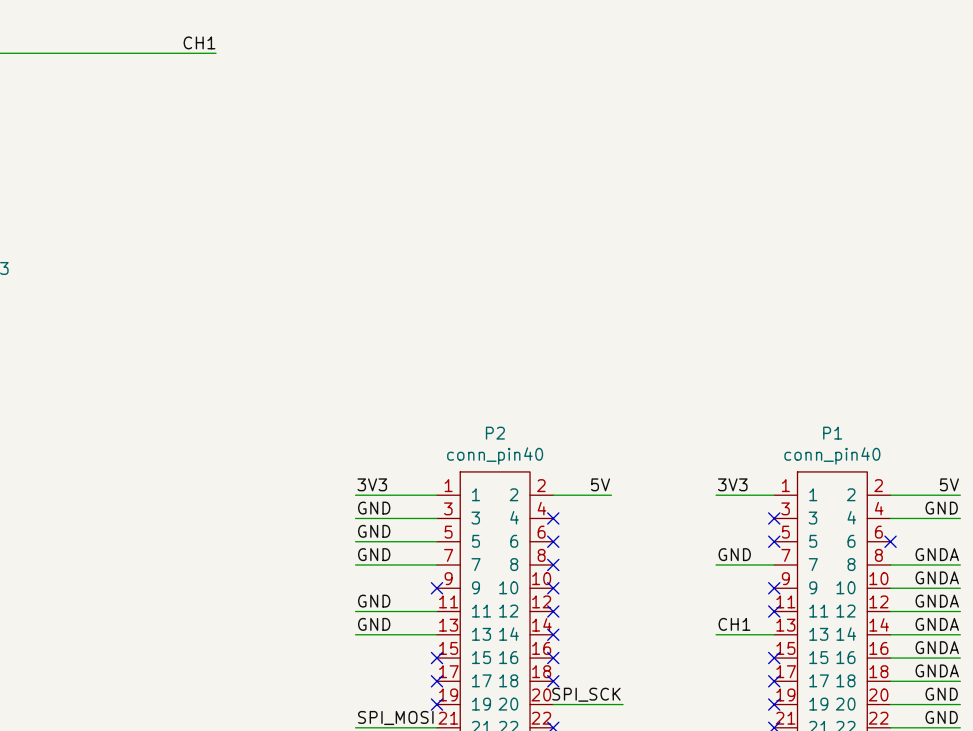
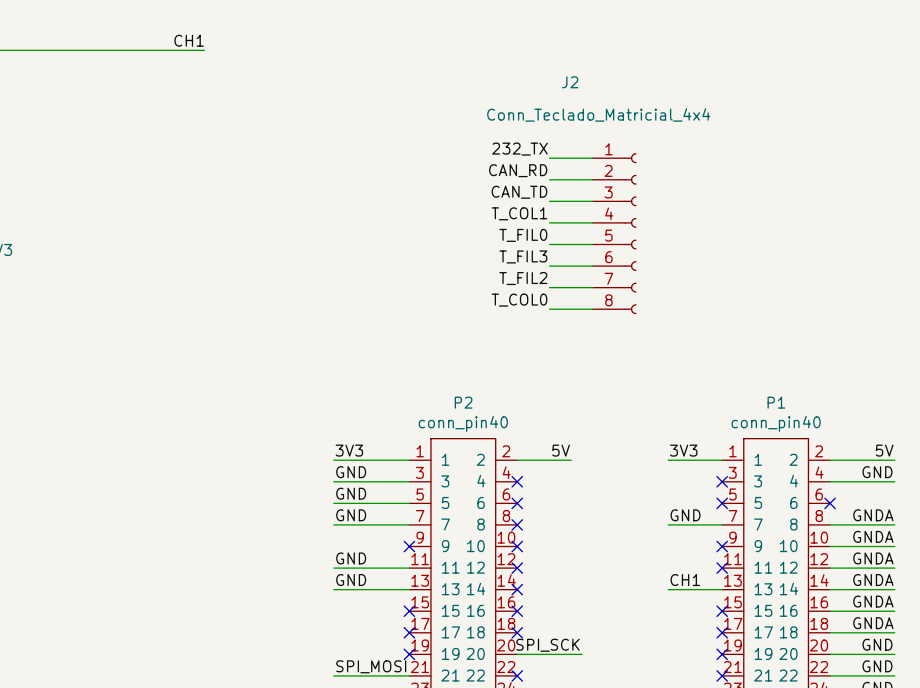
label: none -> 232_TX (519, 149)
wire: none -> (549, 158) (592, 158)
label: none -> CAN_RD (518, 170)
wire: none -> (549, 179) (592, 179)
label: none -> CAN_TD (519, 192)
wire: none -> (549, 201) (592, 201)
label: none -> T_COL1 (519, 213)
wire: none -> (549, 222) (592, 222)
J2: none -> Conn_Teclado_Matricial_4x4 (614, 233)
label: none -> T_FIL0 (523, 235)
wire: none -> (549, 244) (592, 244)
label: none -> T_FIL3 (523, 256)
wire: none -> (549, 266) (592, 266)
label: none -> T_FIL2 (523, 278)
wire: none -> (549, 287) (592, 287)
label: none -> T_COL0 (519, 300)
wire: none -> (549, 309) (592, 309)

